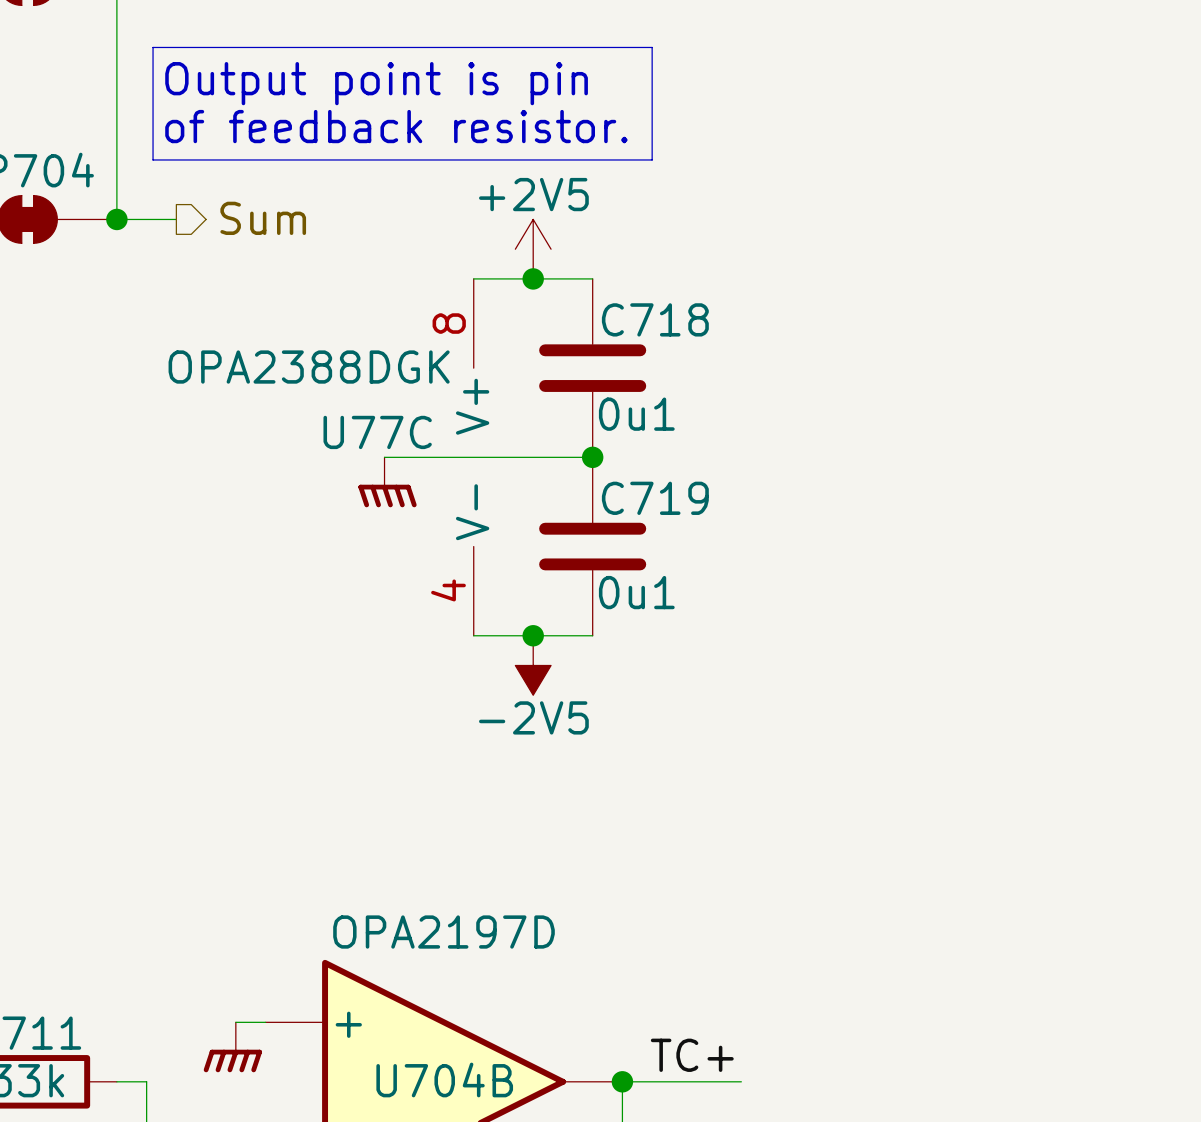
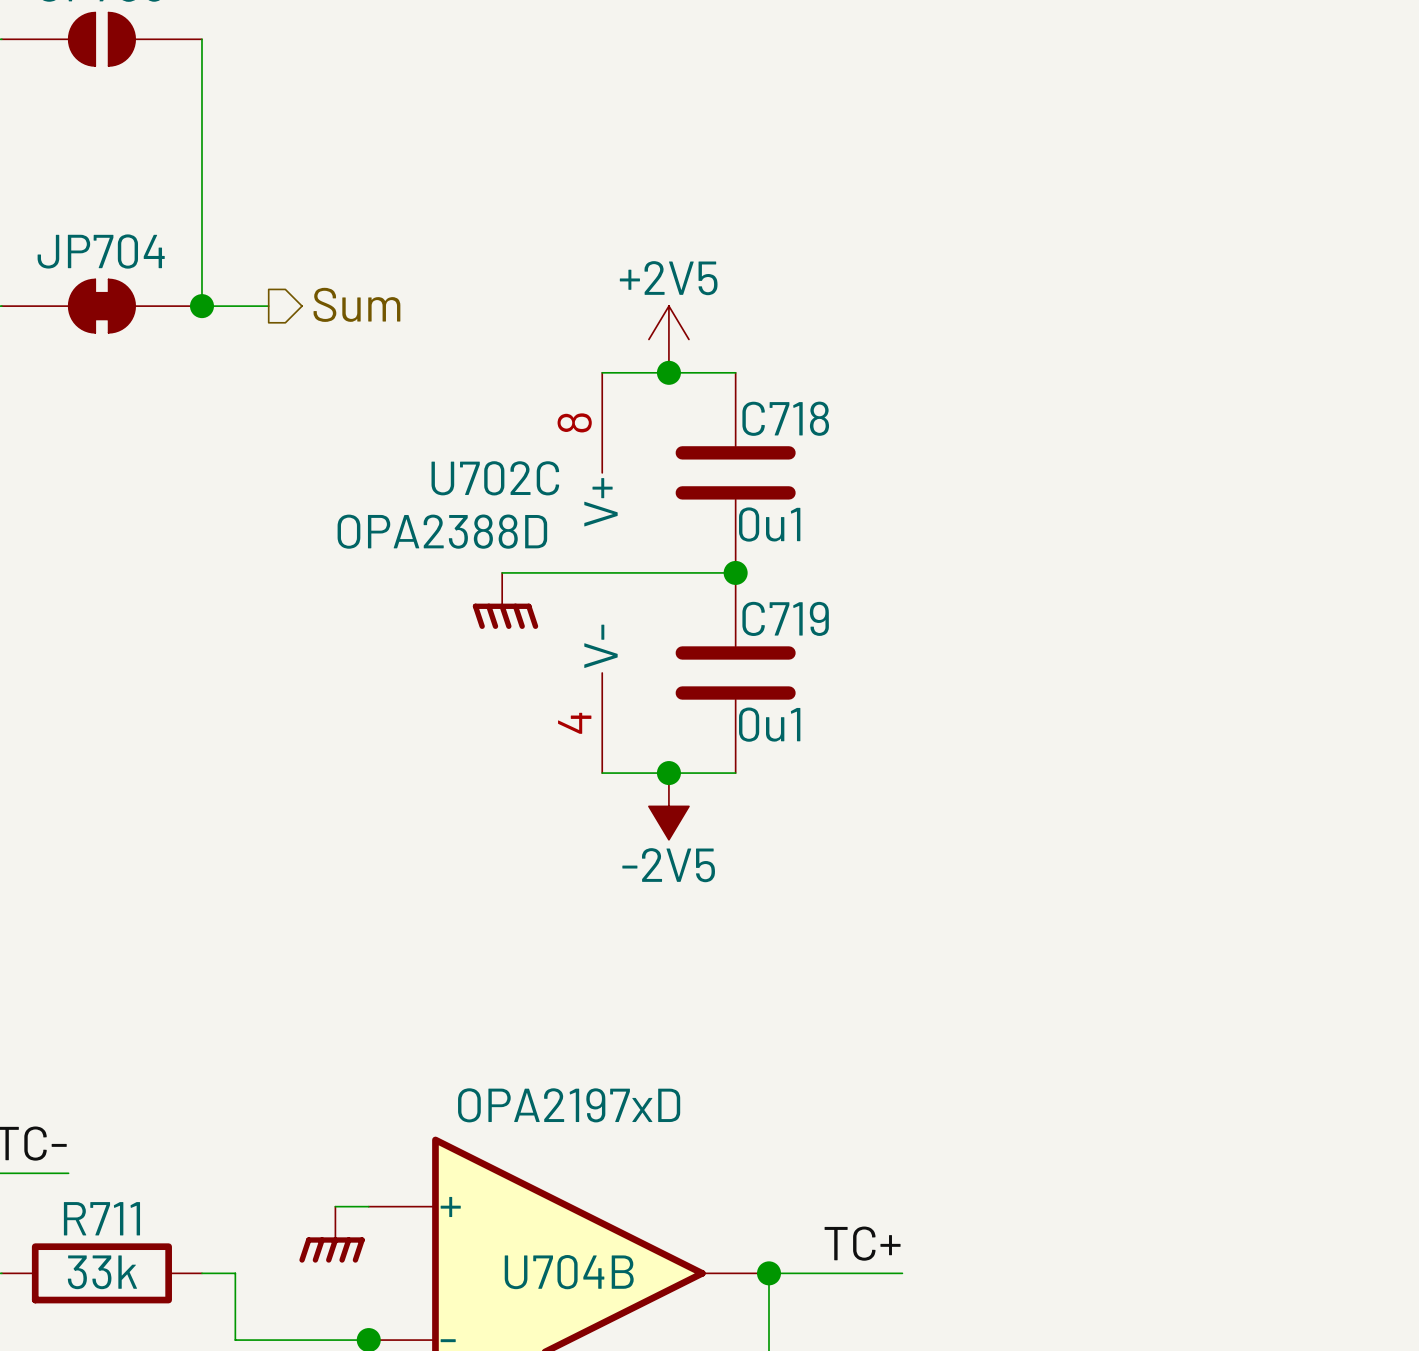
line: (153, 47) (652, 47) (652, 159) (153, 159) (153, 47) -> none
text: Output point is pin (376, 83) -> none
text: of feedback resistor. (396, 126) -> none
U77C value: OPA2388DGK (309, 367) -> OPA2388D (442, 531)
U77C name: U77C (377, 432) -> U702C (495, 478)
U704B value: OPA2197D (444, 932) -> OPA2197xD (569, 1105)

